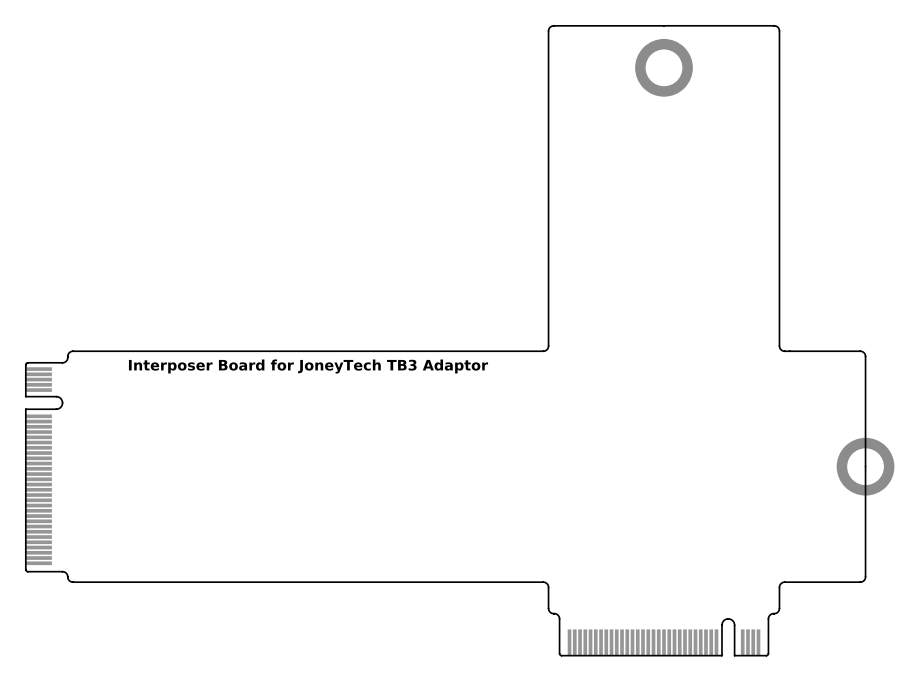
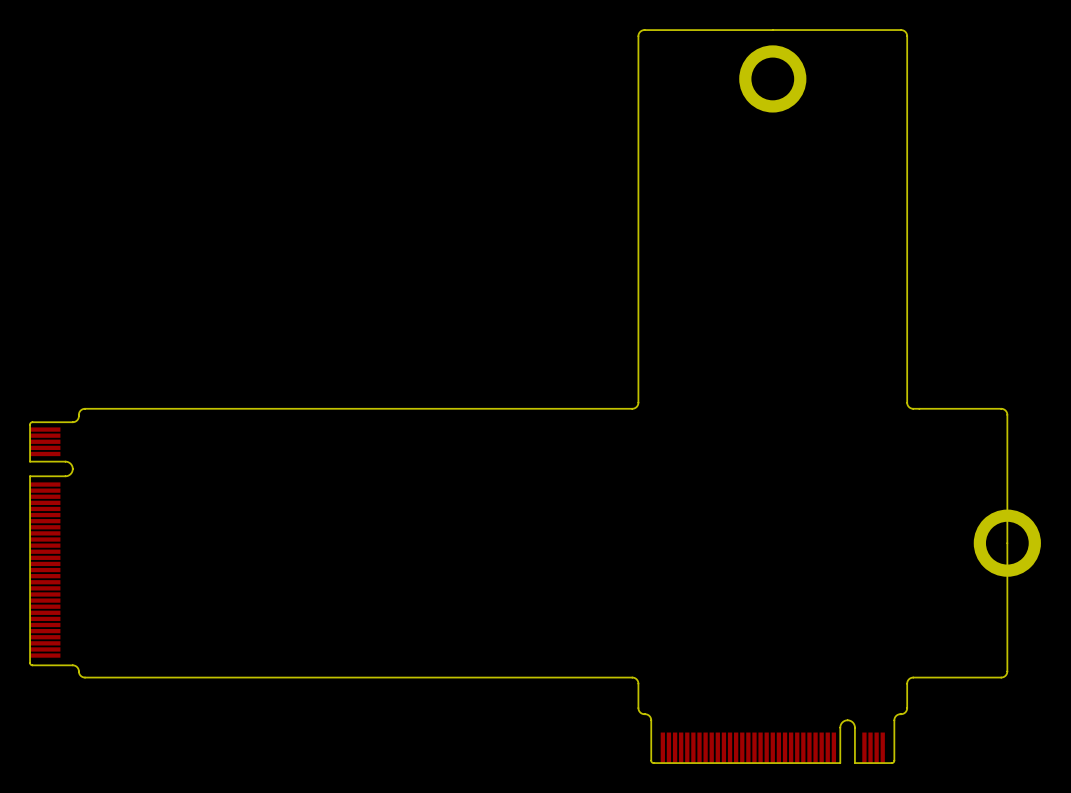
text: Interposer Board for JoneyTech TB3 Adaptor (308, 366) -> none

